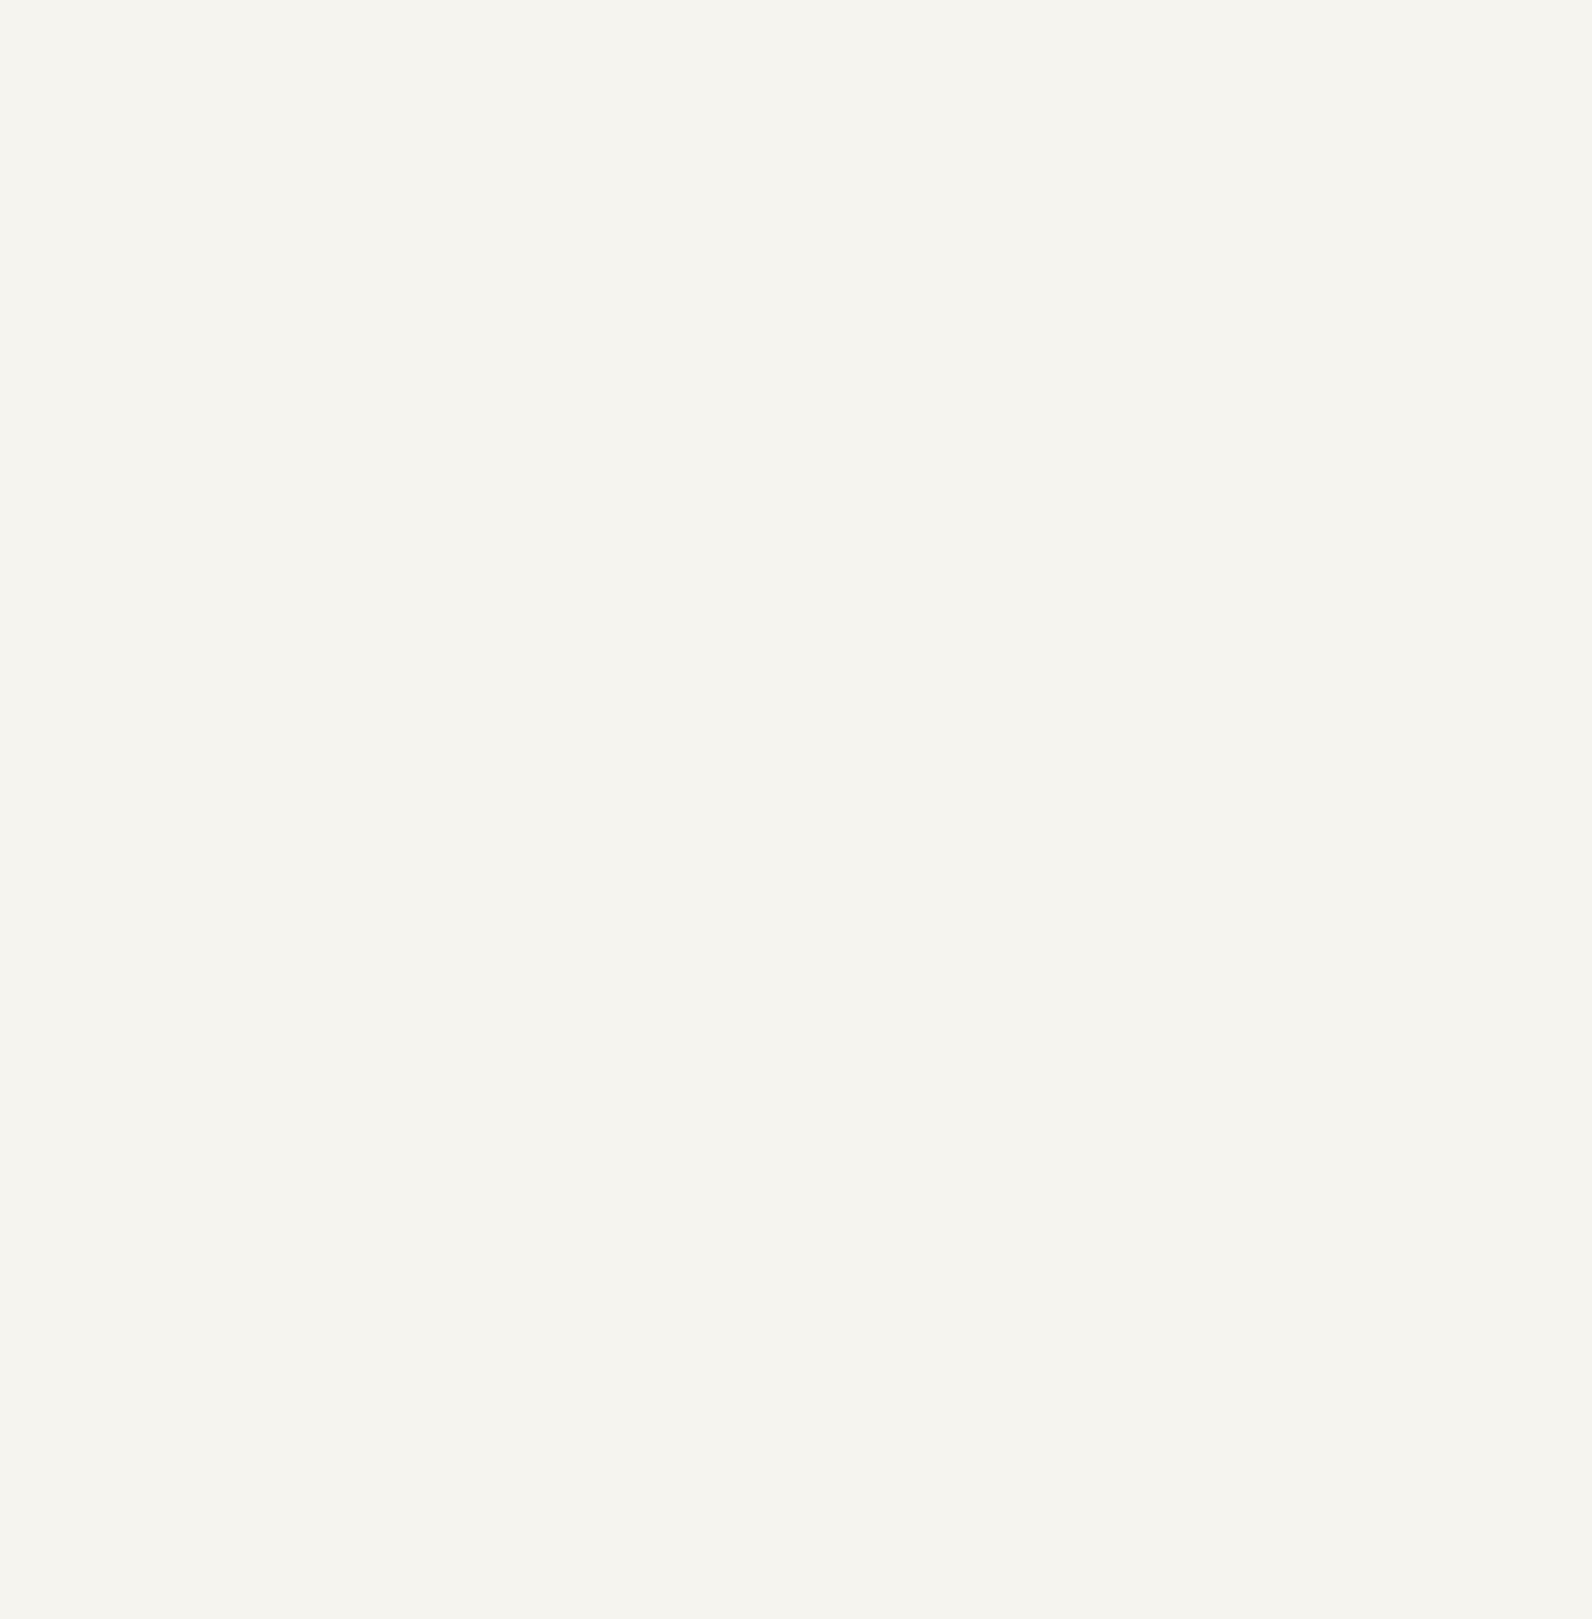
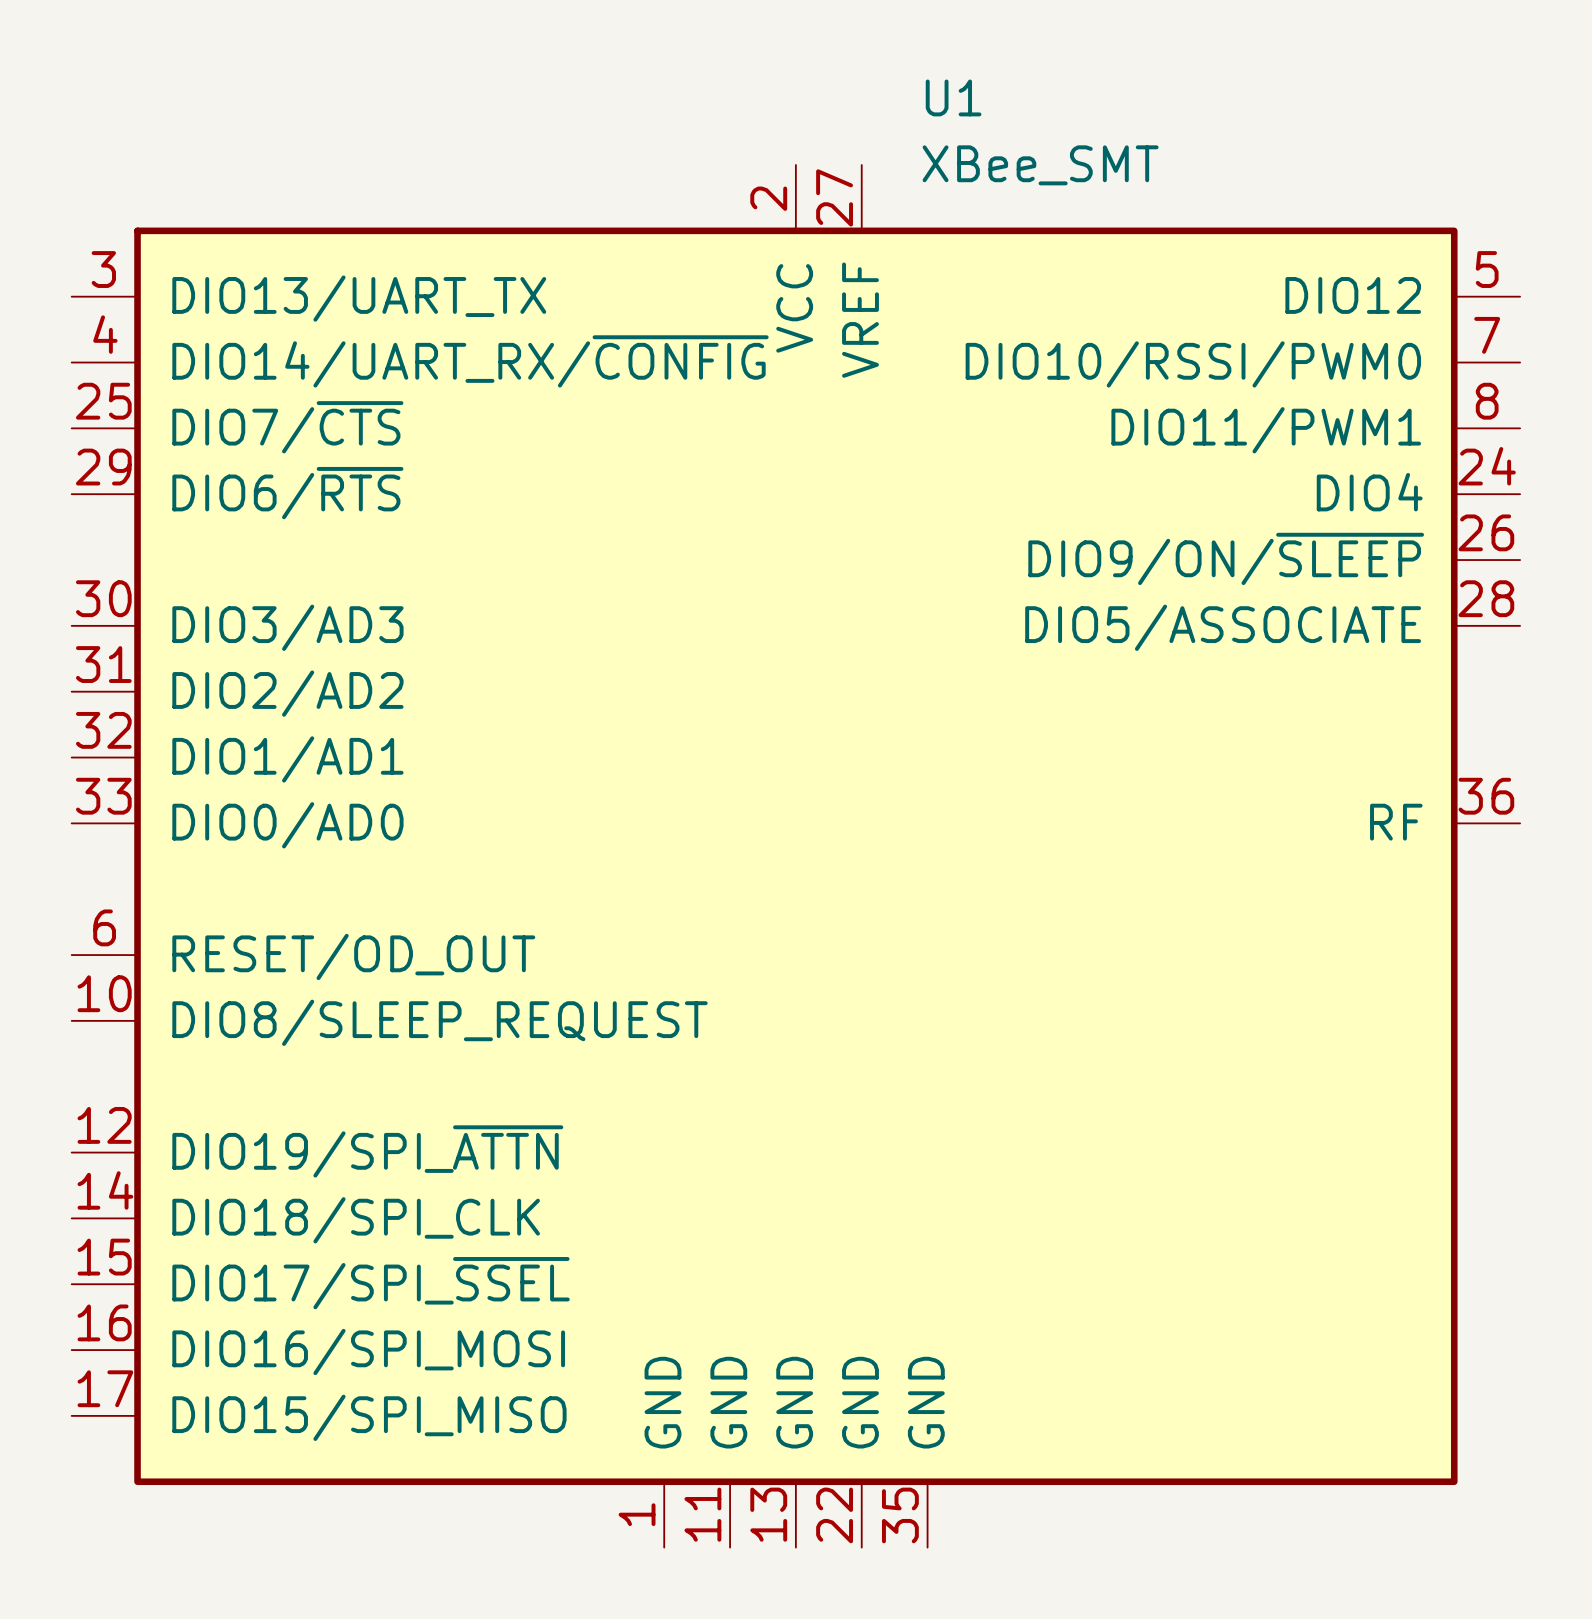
U1: none -> XBee_SMT (795, 856)

